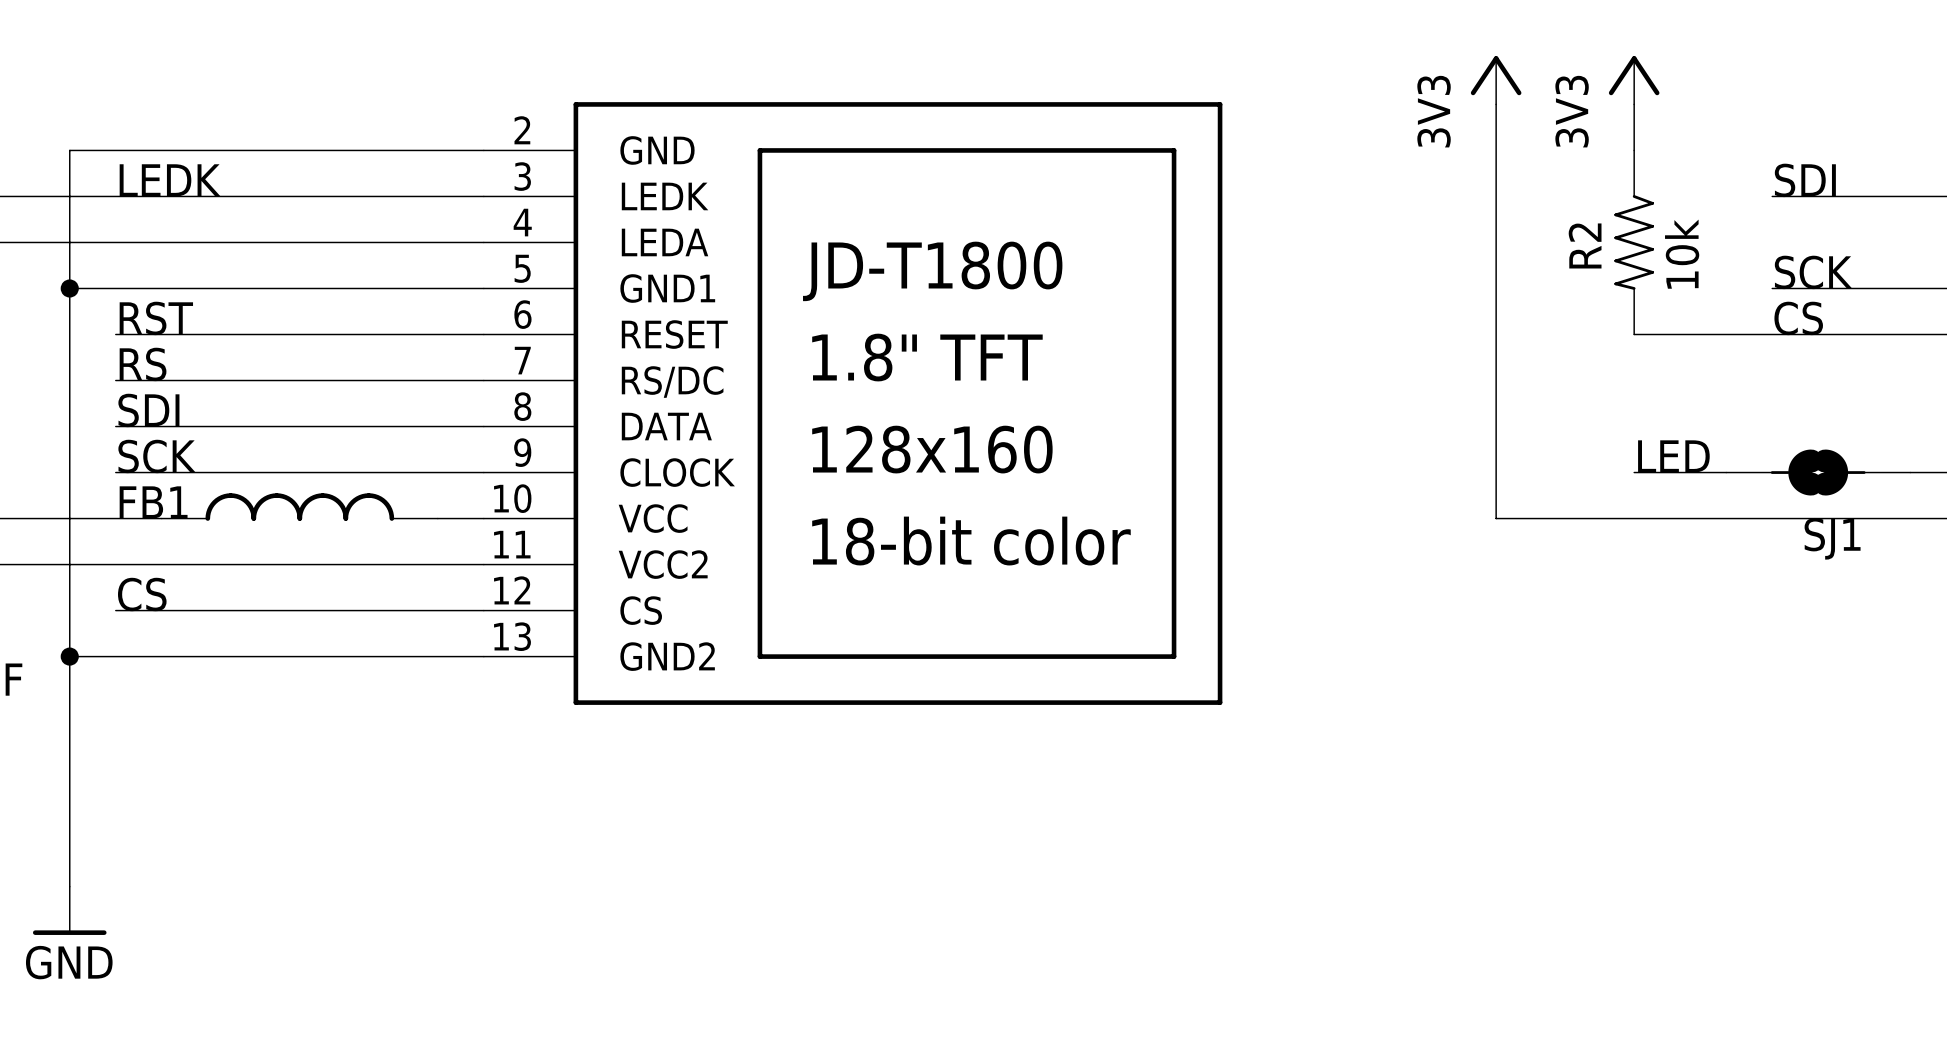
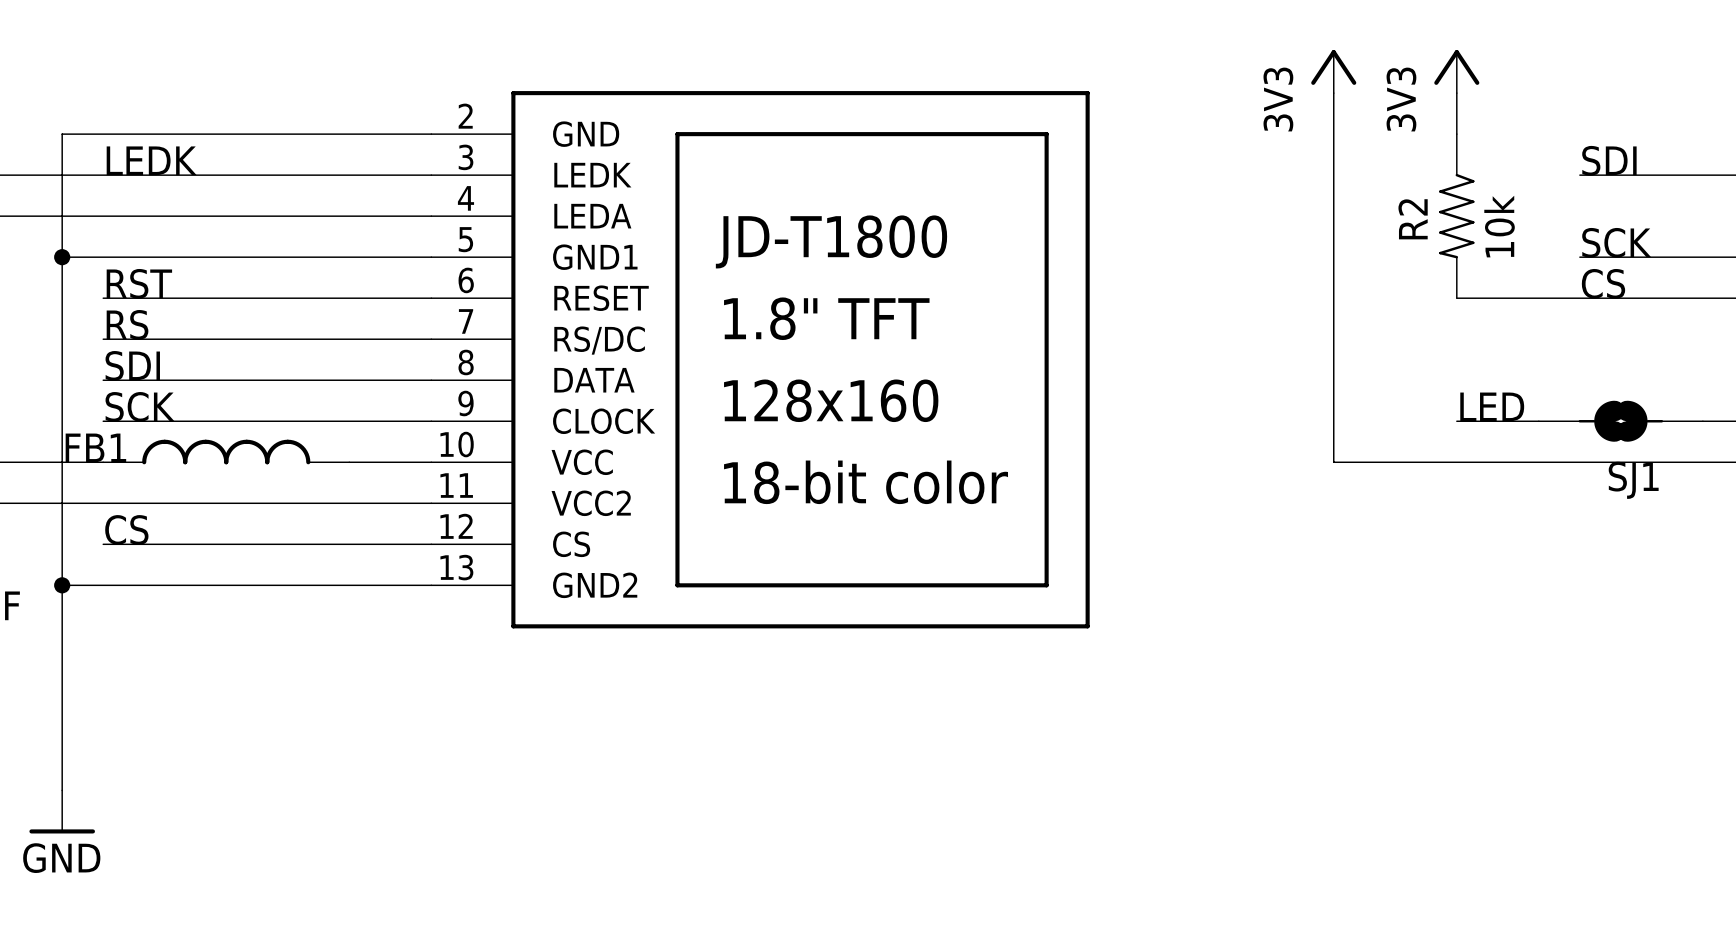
FB1 position: (299, 507) -> (226, 452)

